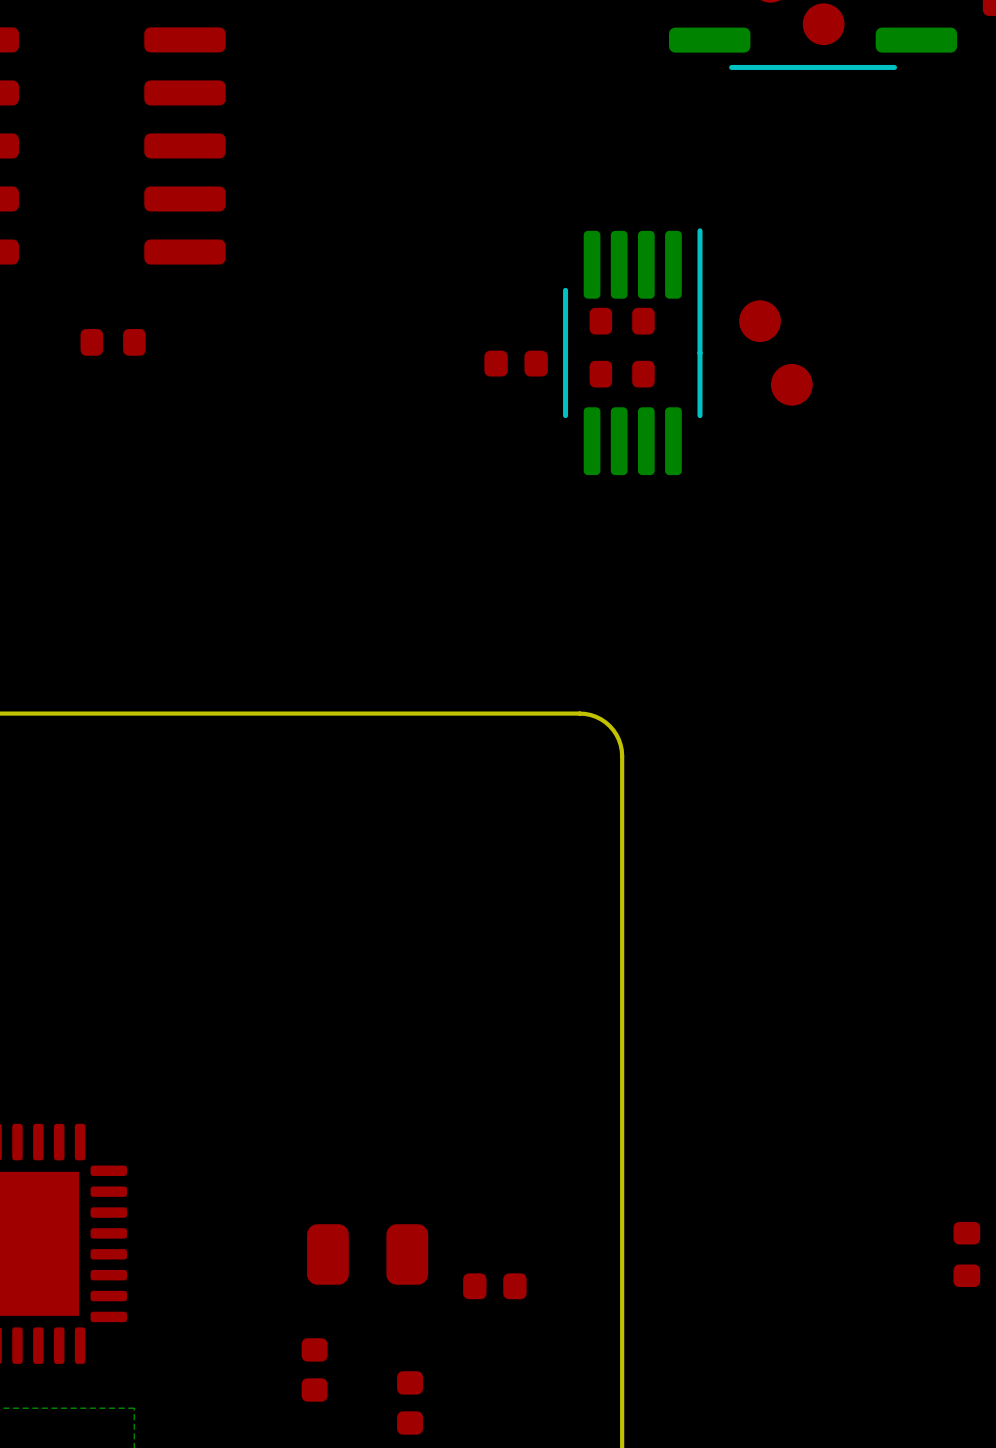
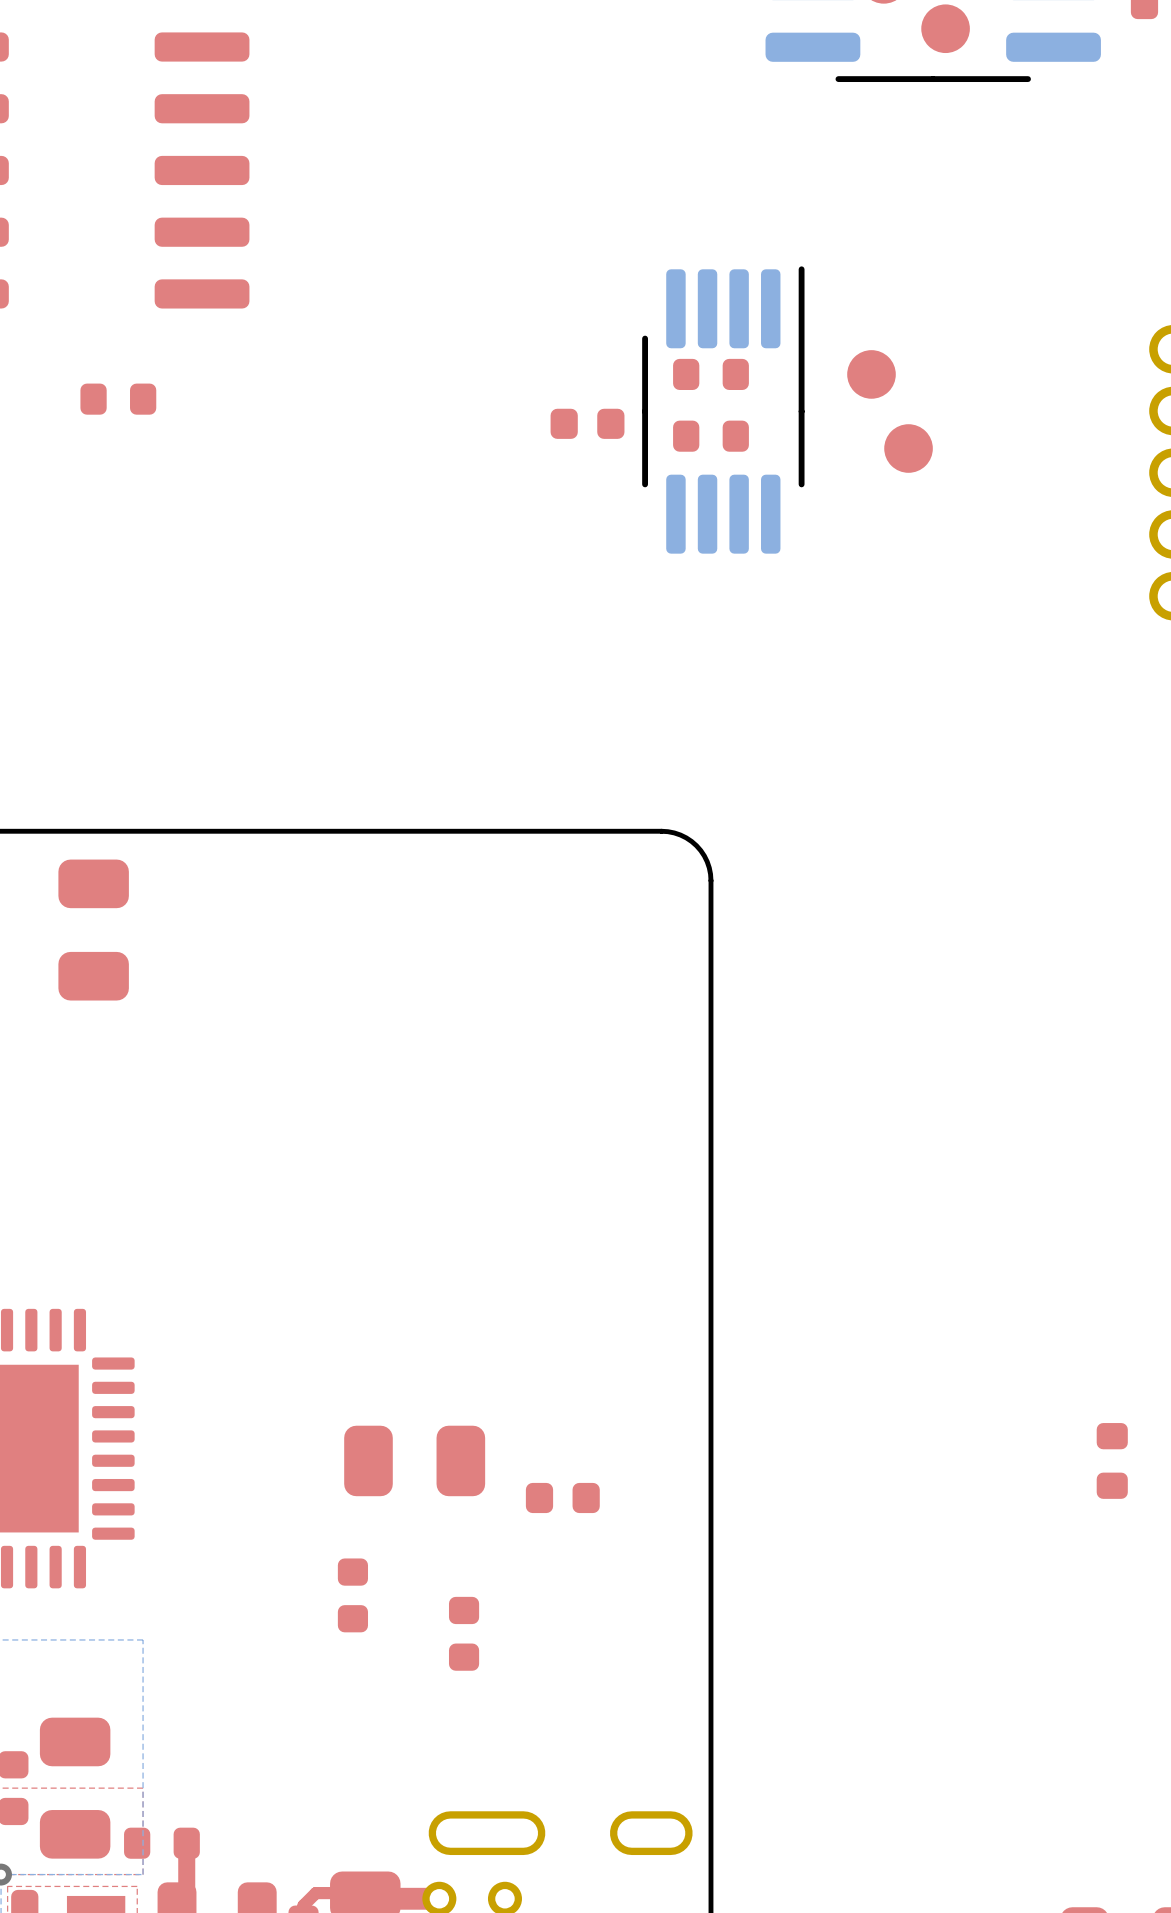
part: none -> (93, 930)

